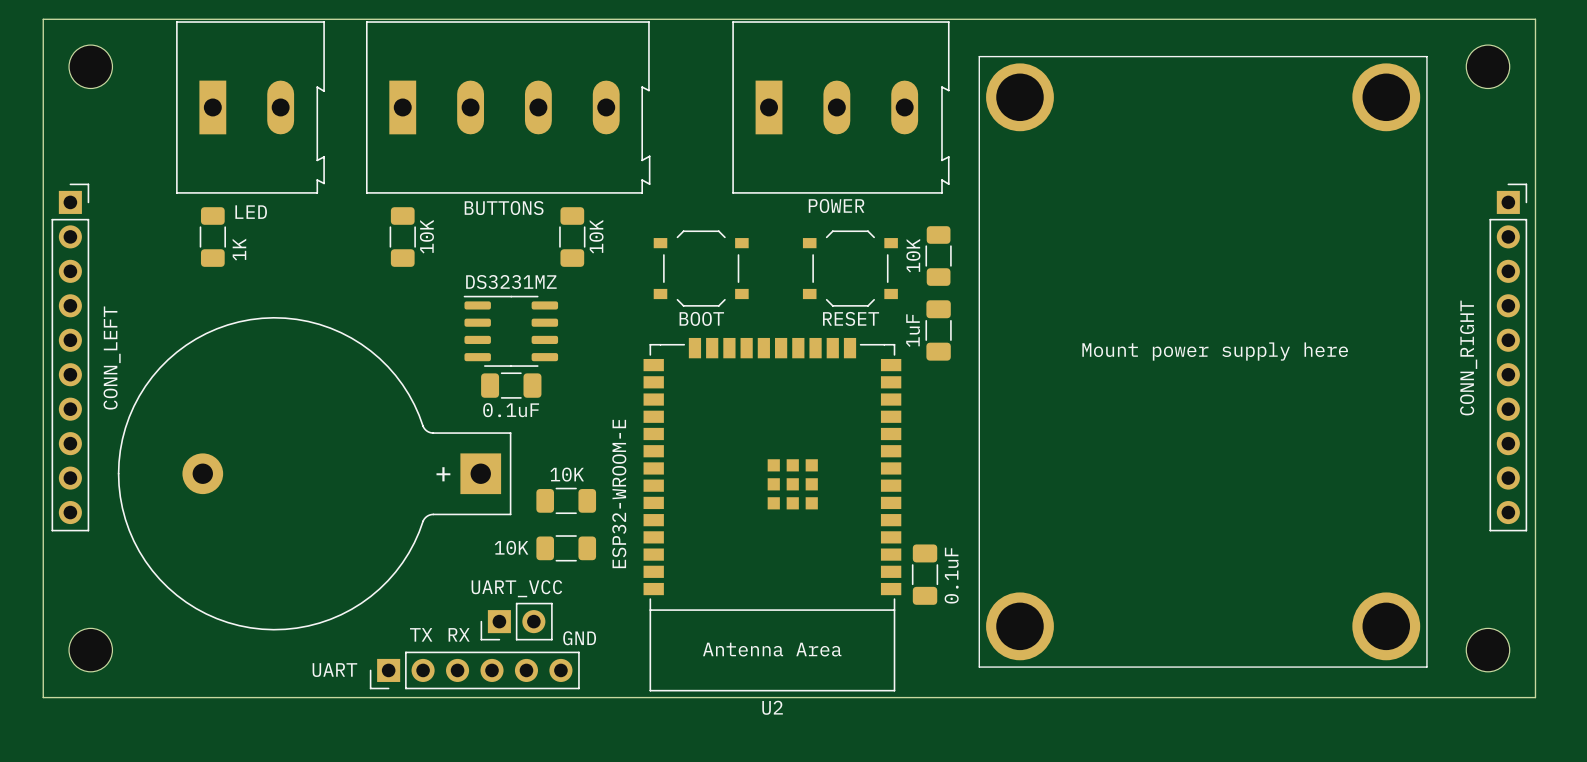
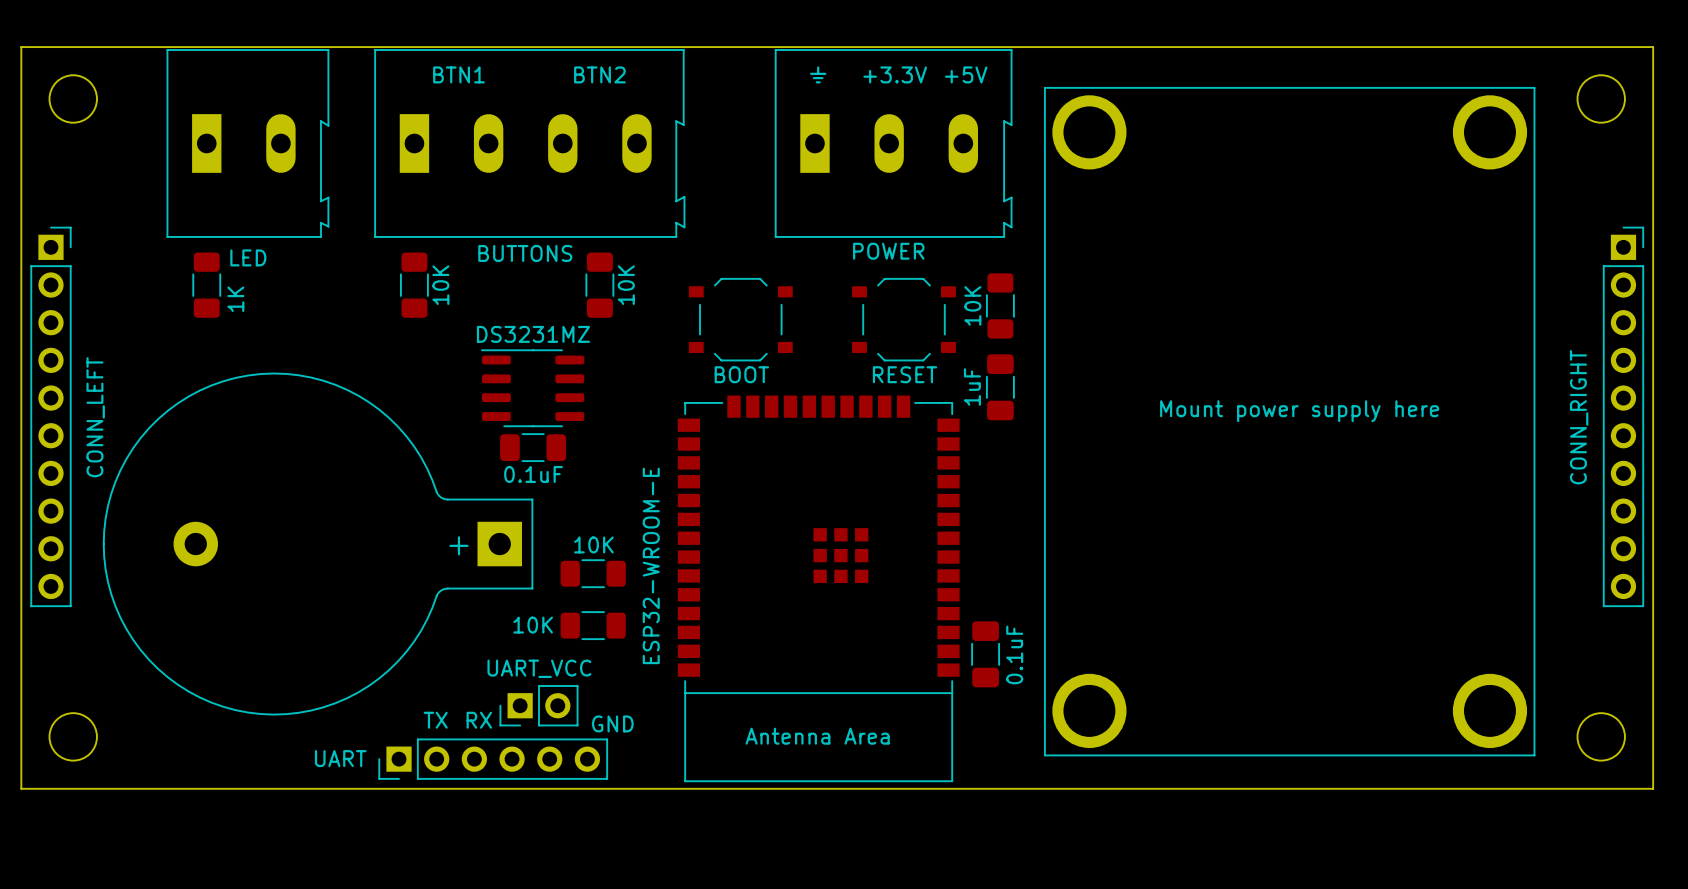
text: none -> BTN1 (459, 74)
text: none -> BTN2 (599, 74)
text: none -> ⏚ (818, 74)
text: none -> +3.3V (895, 74)
text: none -> +5V (966, 74)
U2 name: U2 (772, 707) -> none

